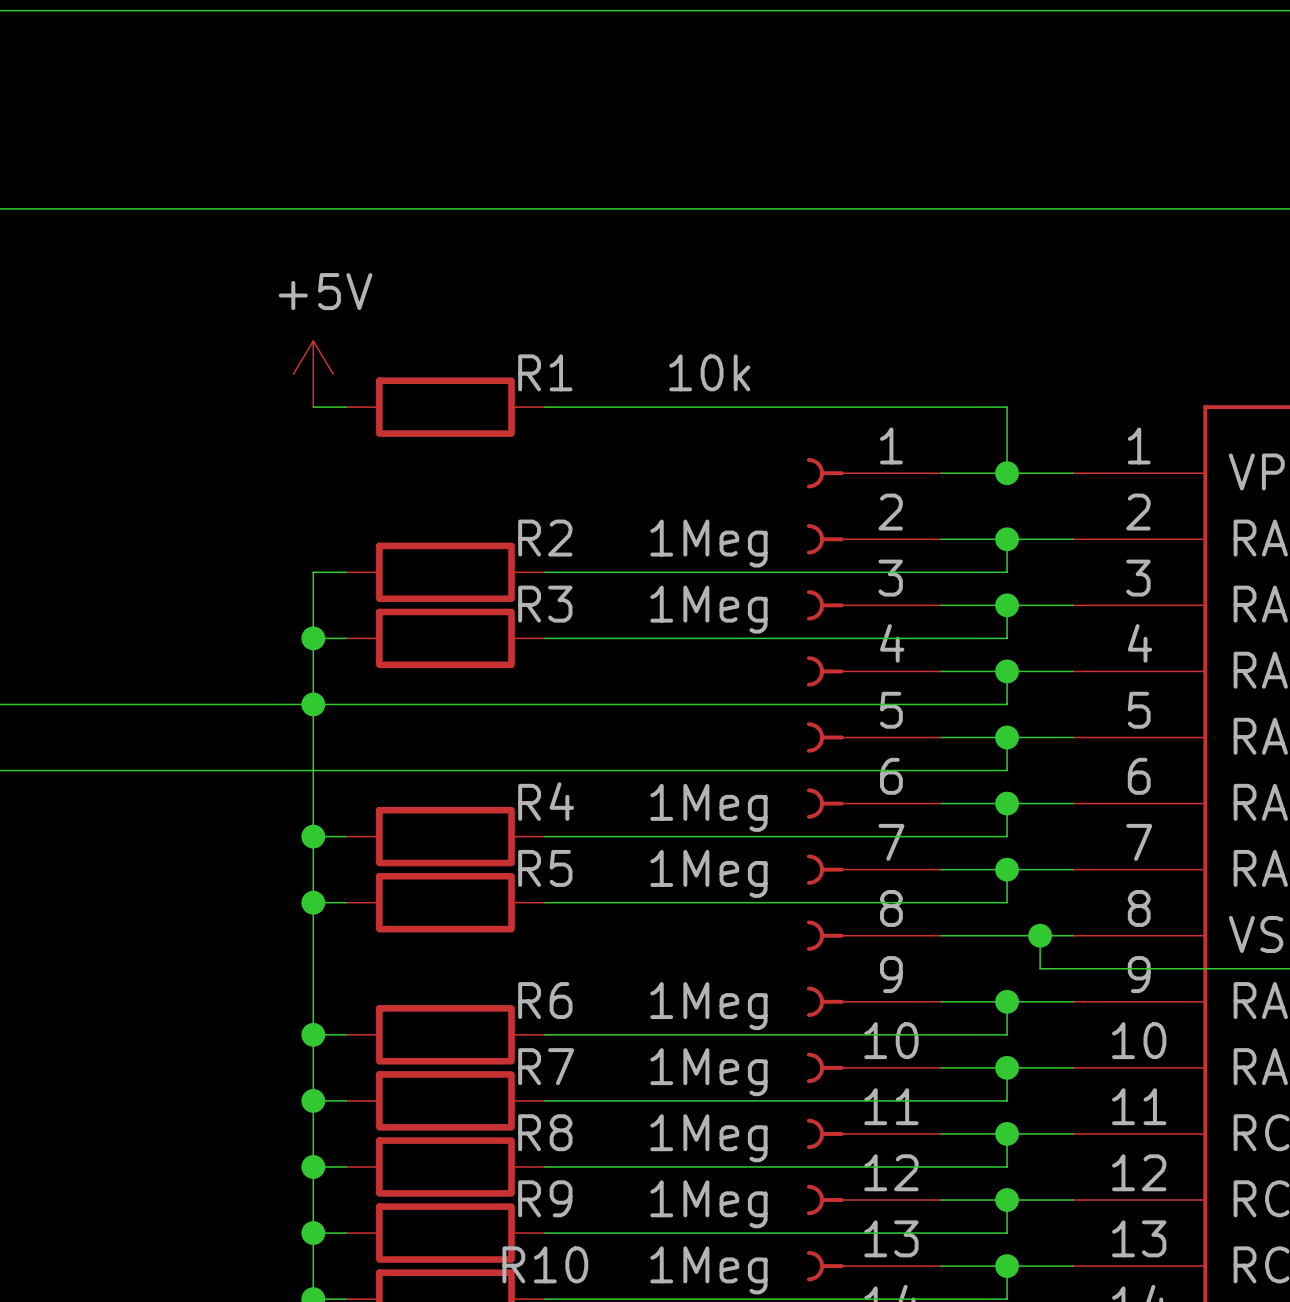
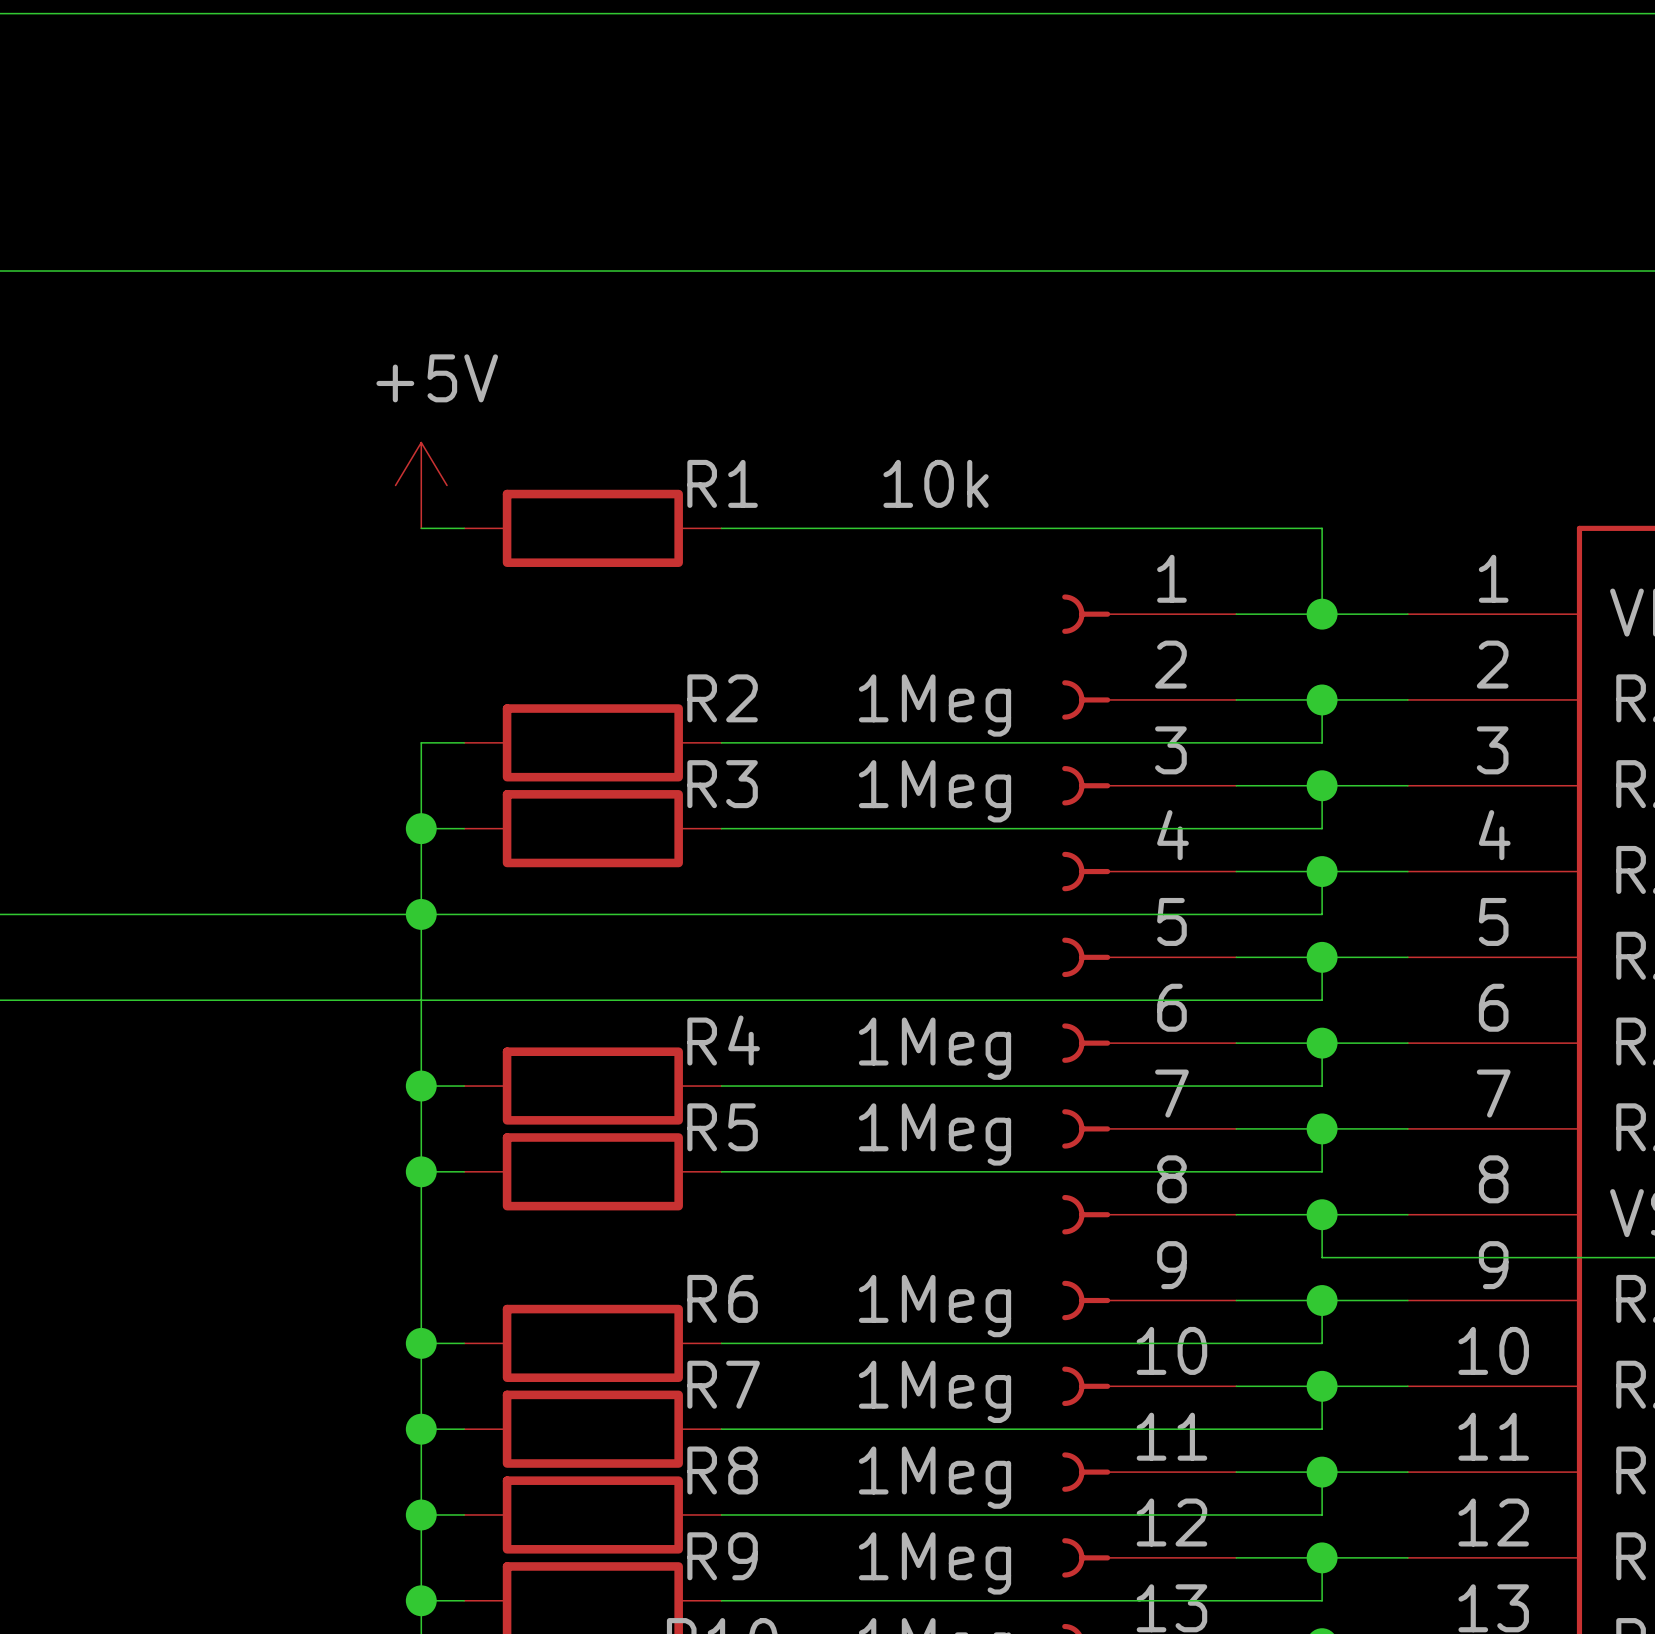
wire: (1040, 935) (1040, 968) -> (1322, 1214) (1322, 1257) (1365, 1257)
junction position: (1040, 935) -> (1322, 1214)

